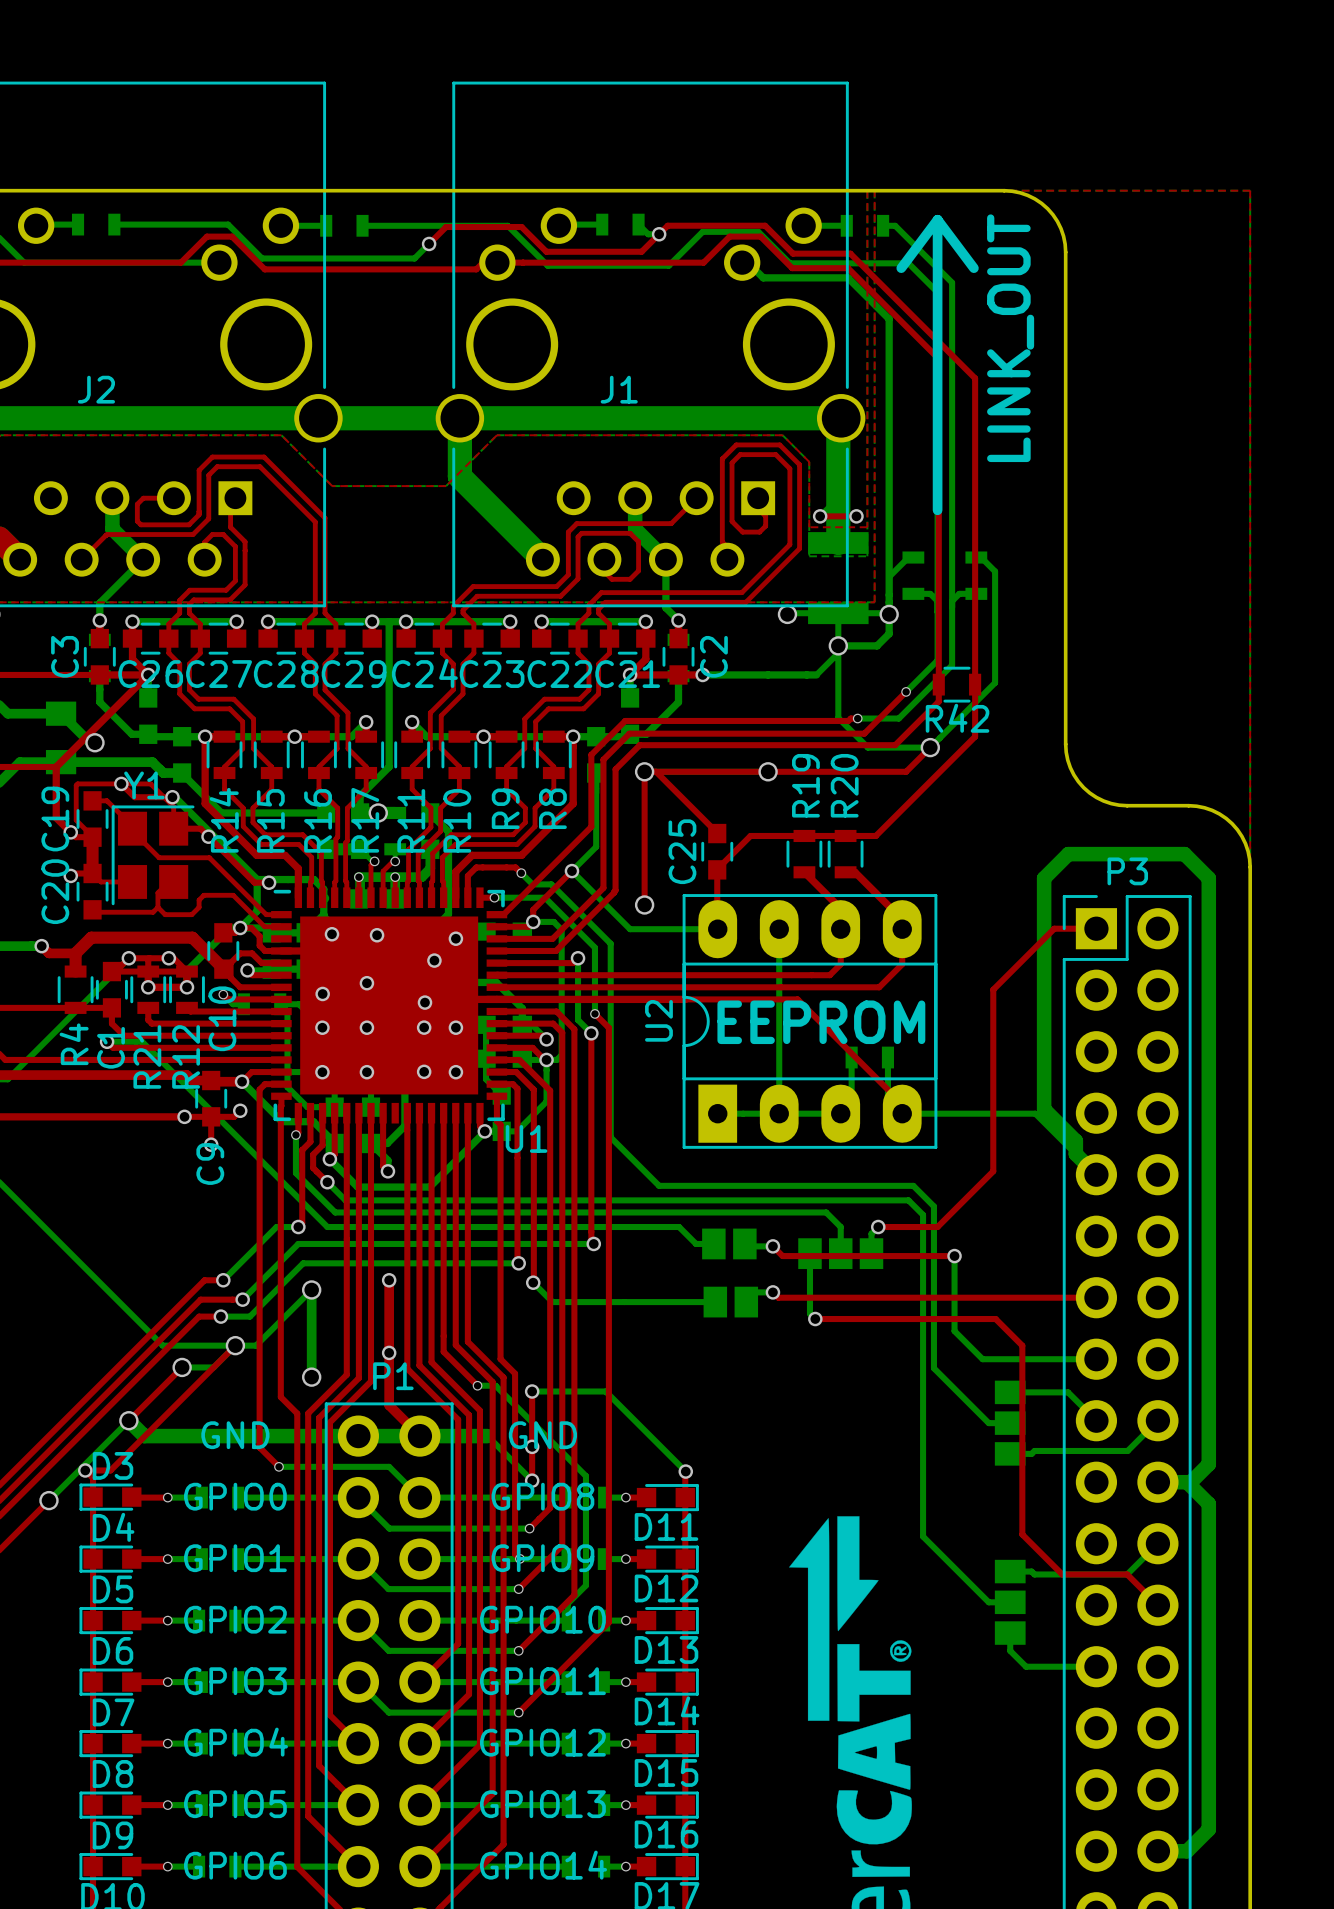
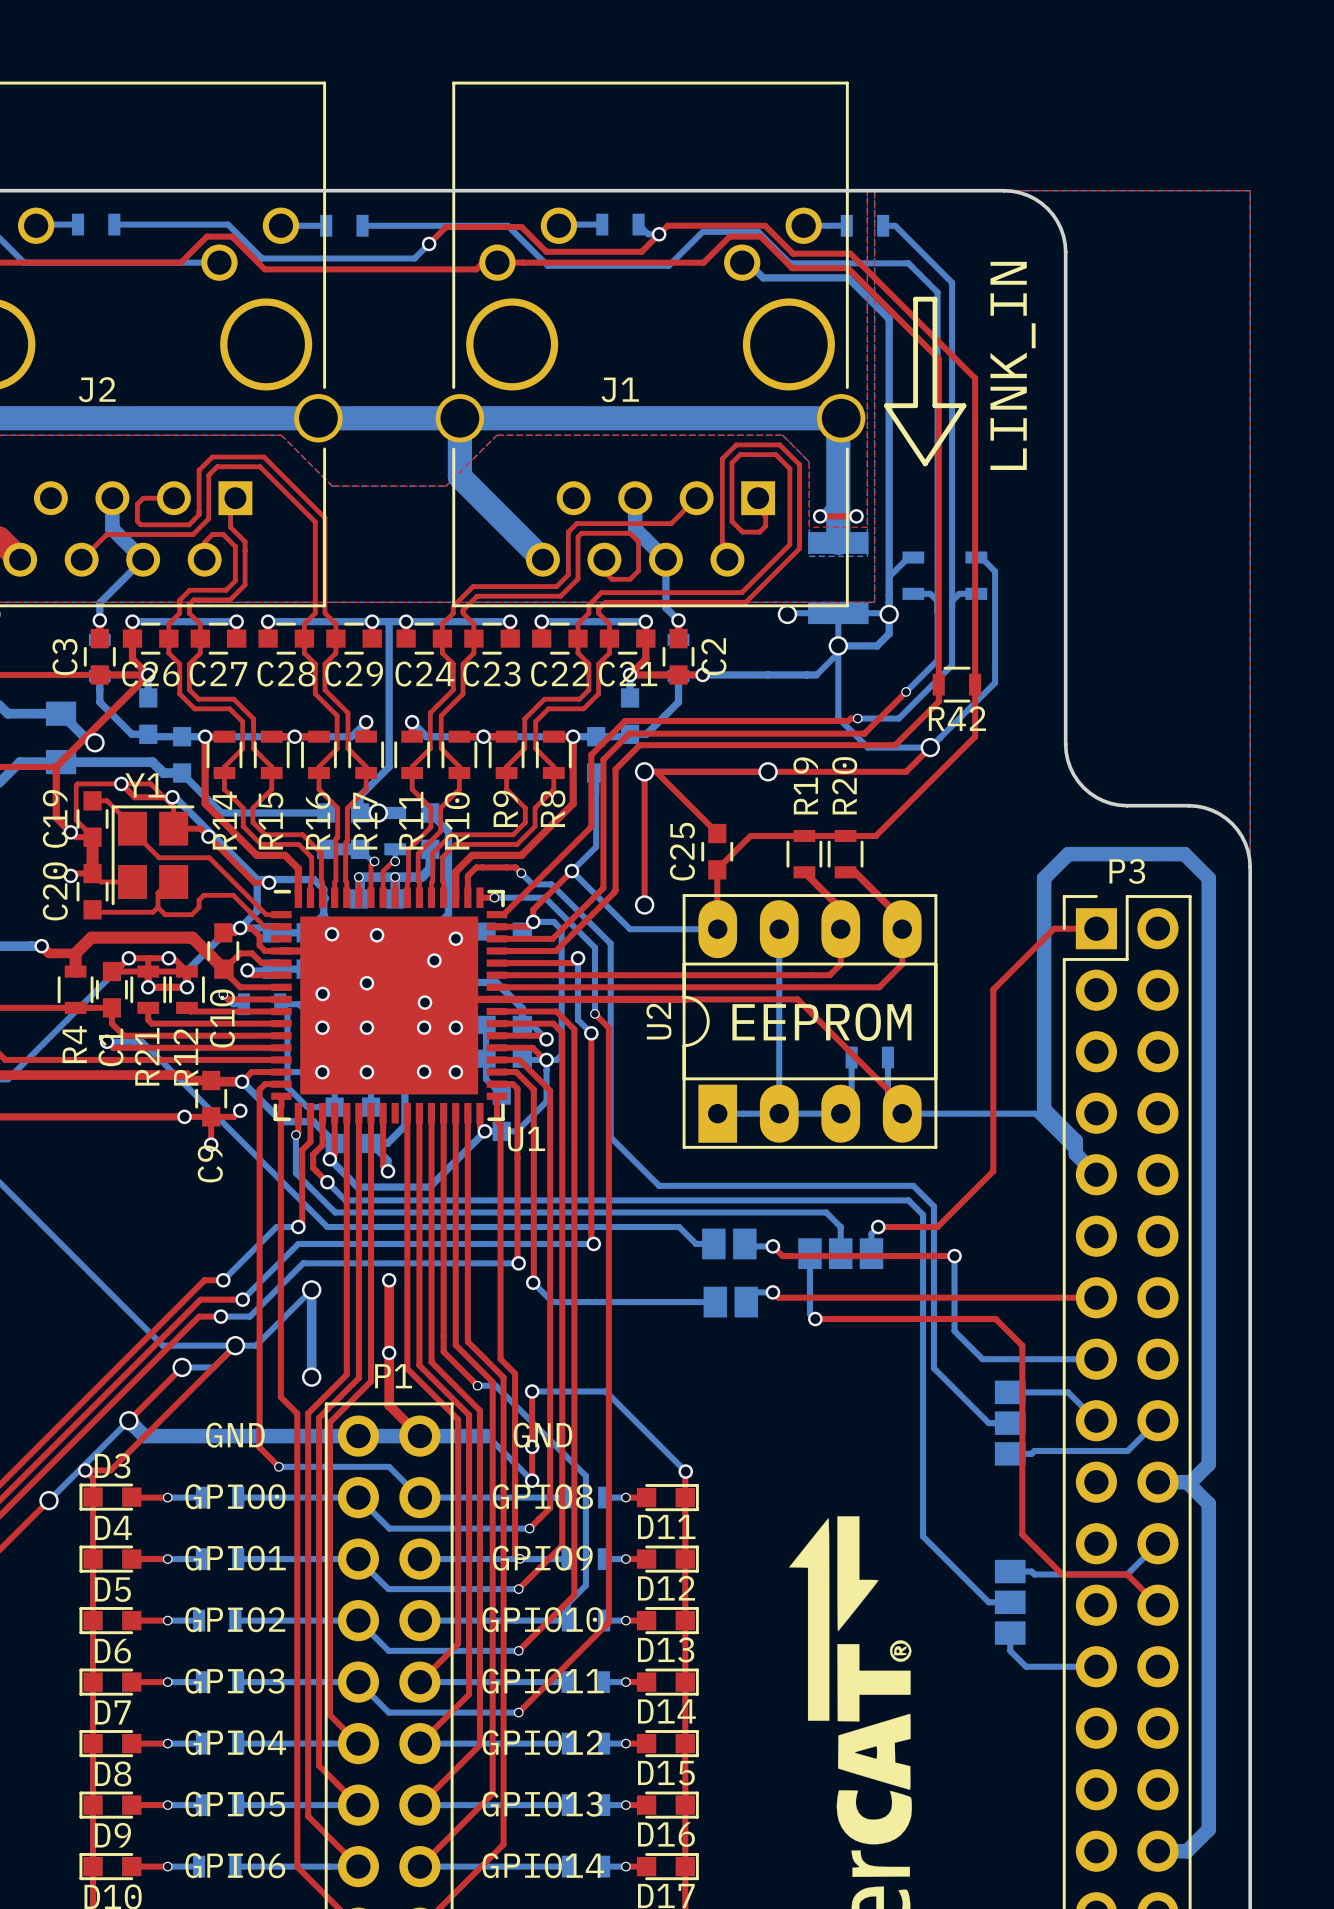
line: (937, 219) (973, 268) -> none
line: (937, 219) (901, 268) -> none
line: (937, 219) (937, 510) -> none
line: none -> (915, 299) (934, 299) (934, 405) (963, 405) (925, 463) (886, 405) (915, 405) (915, 299)
text: LINK_OUT (1010, 338) -> LINK_IN (1013, 365)

